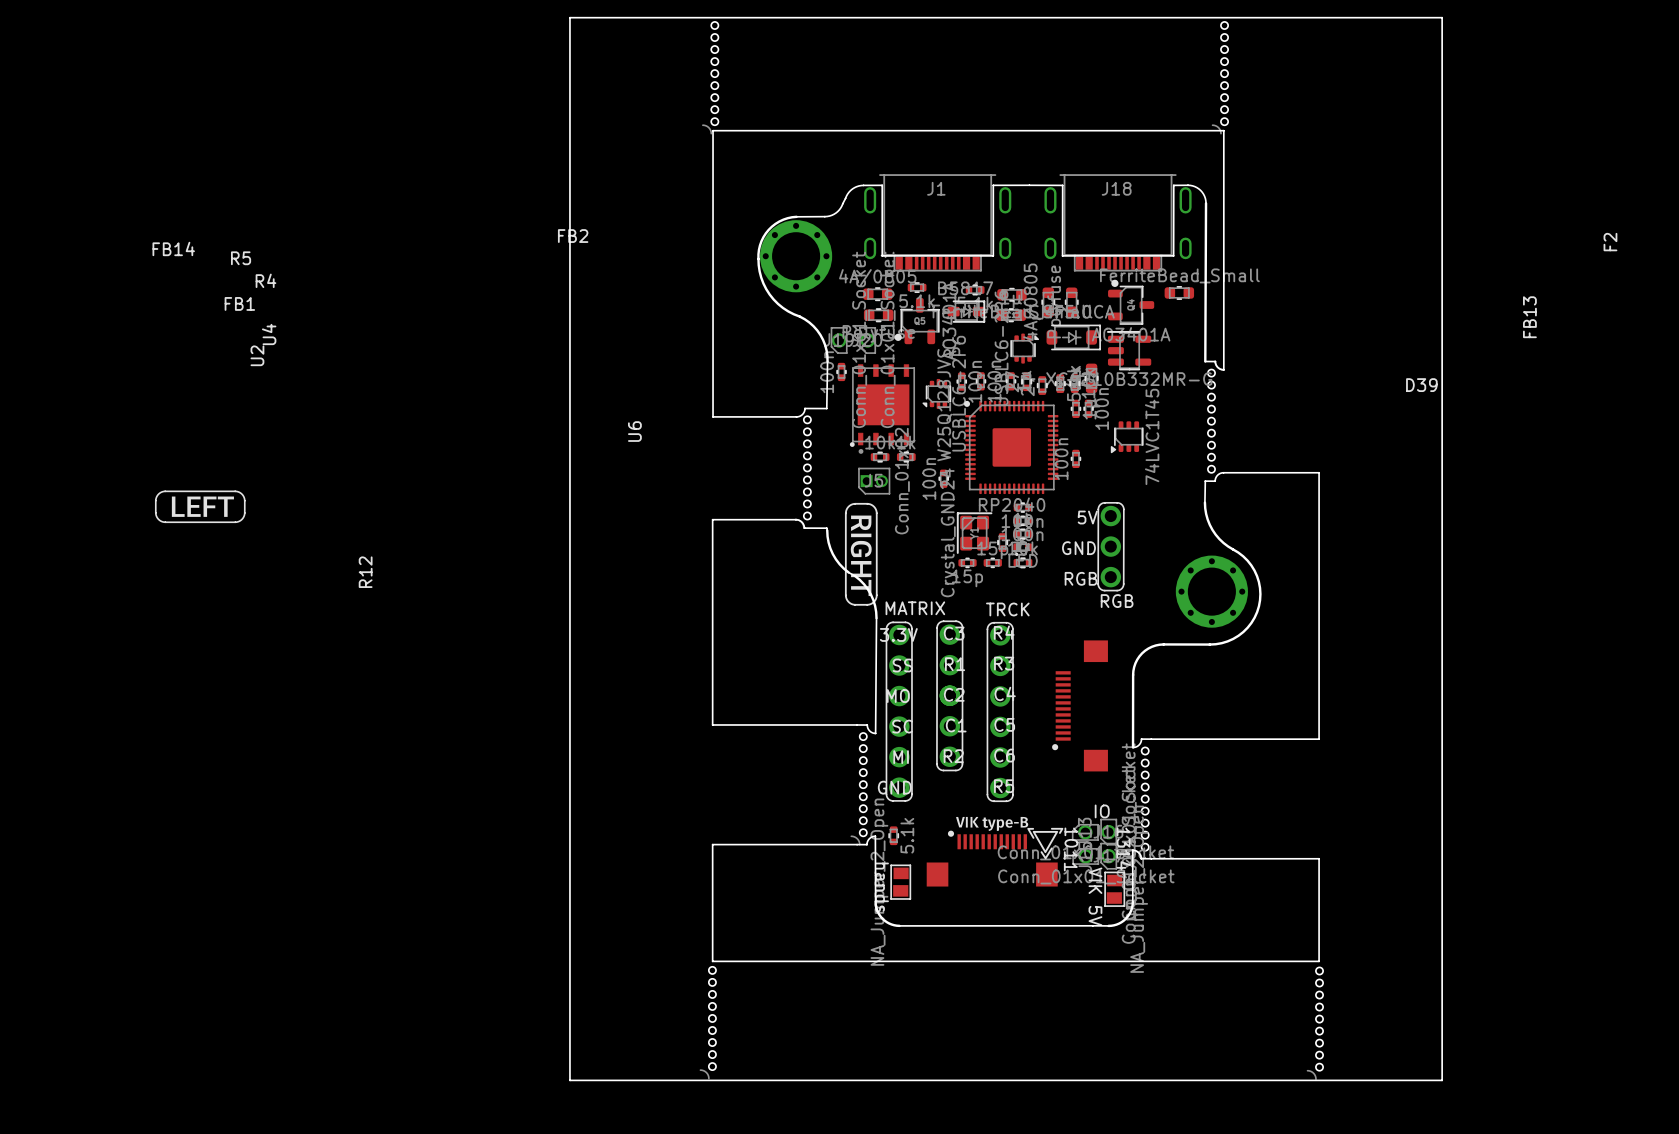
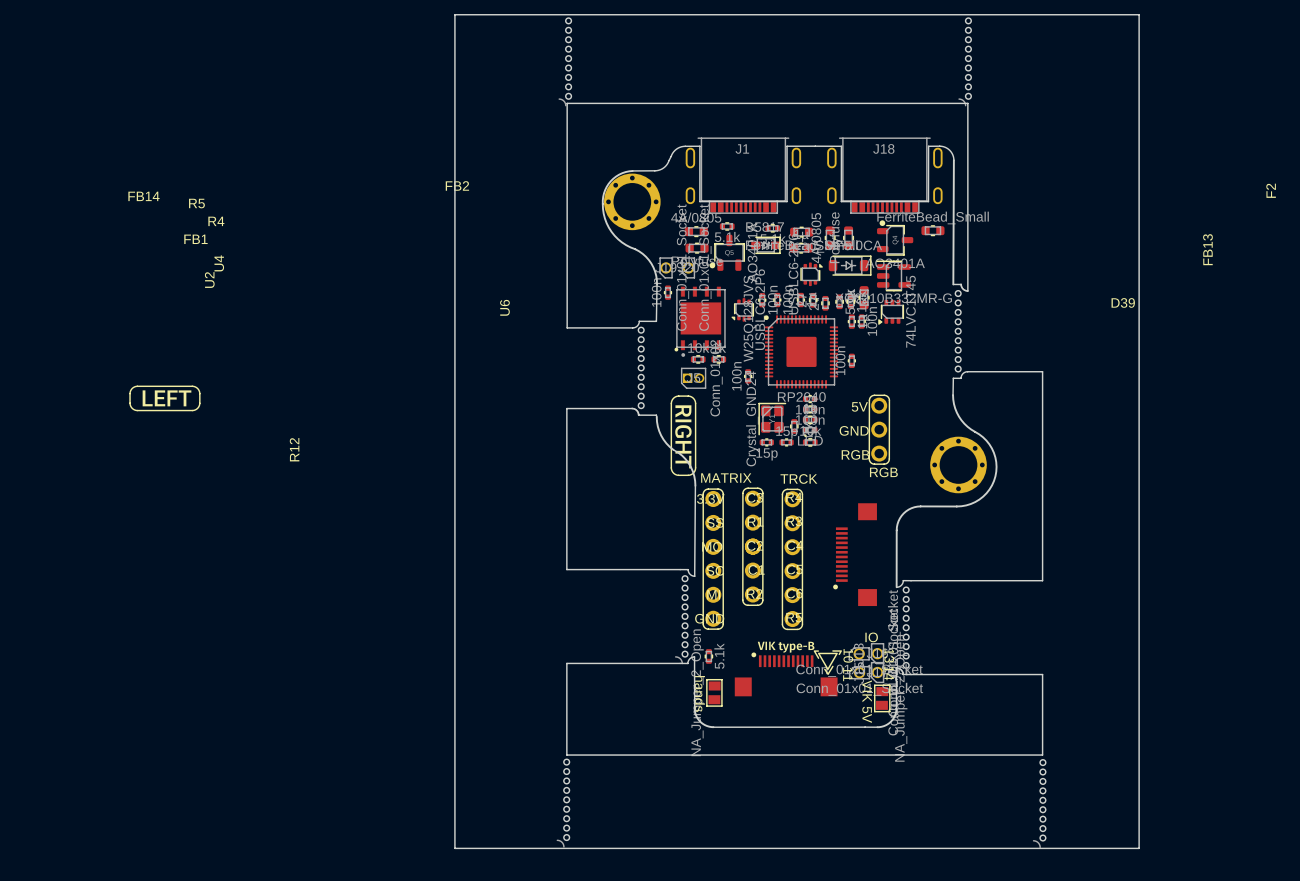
U6 position: (1127, 437) -> (891, 312)

